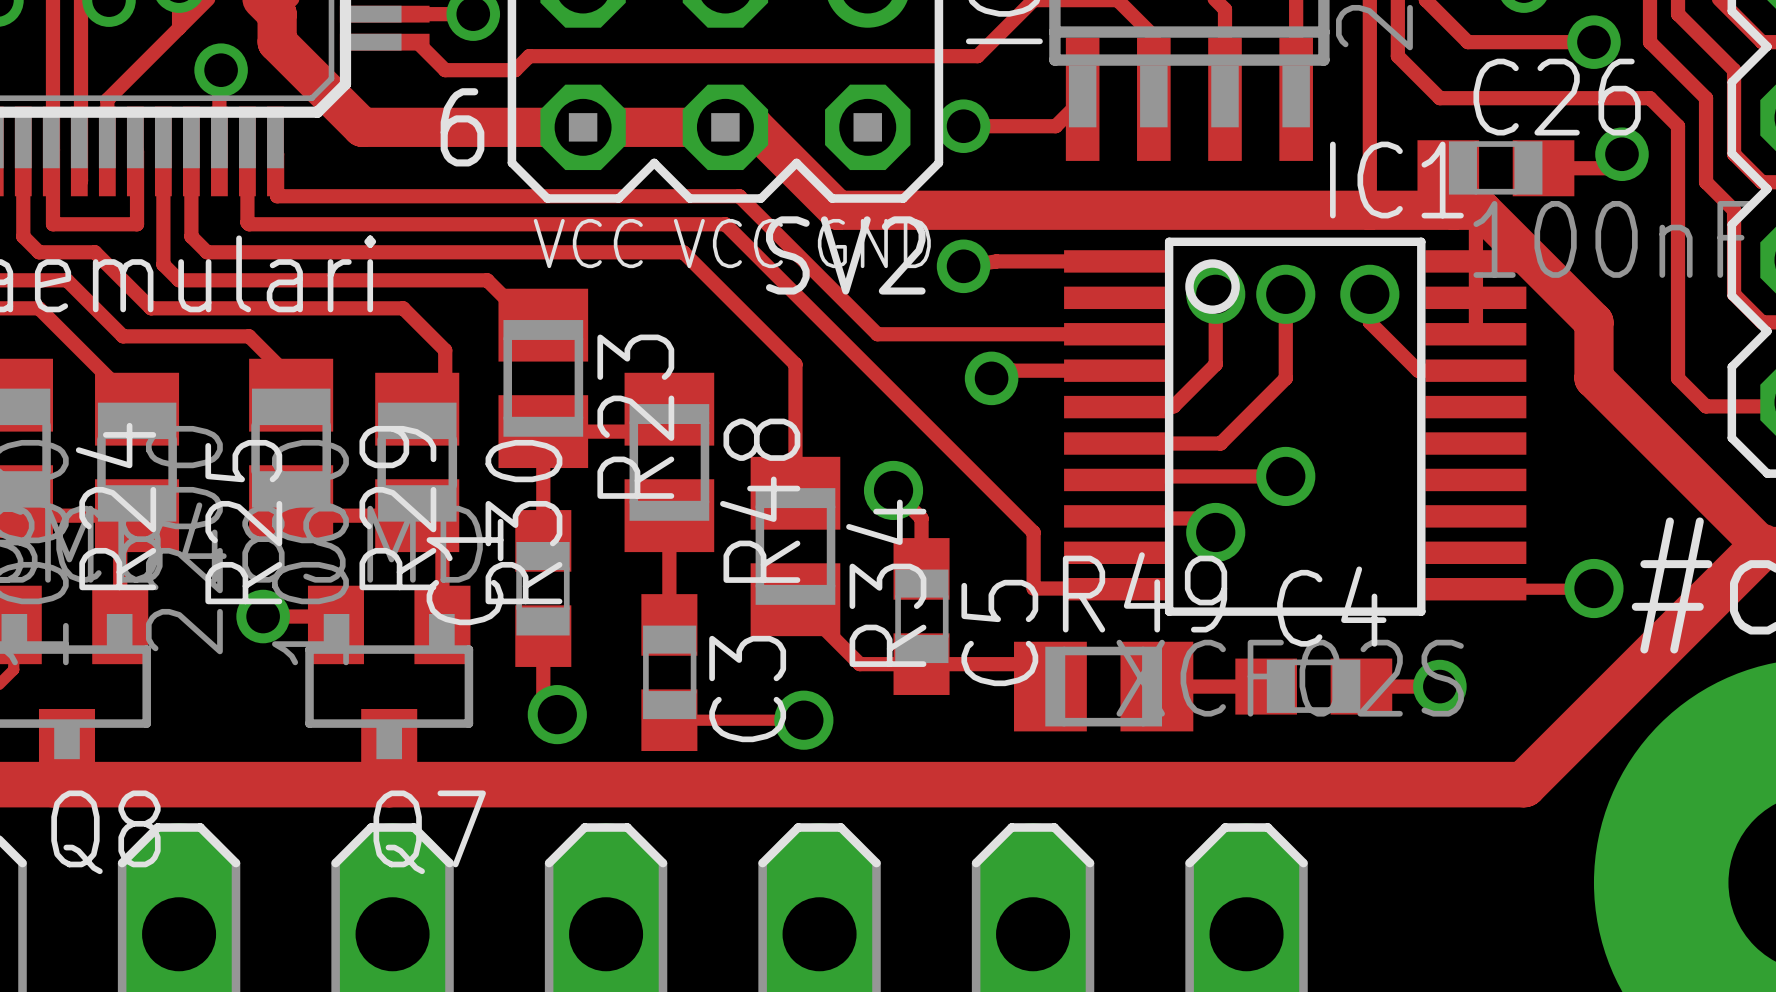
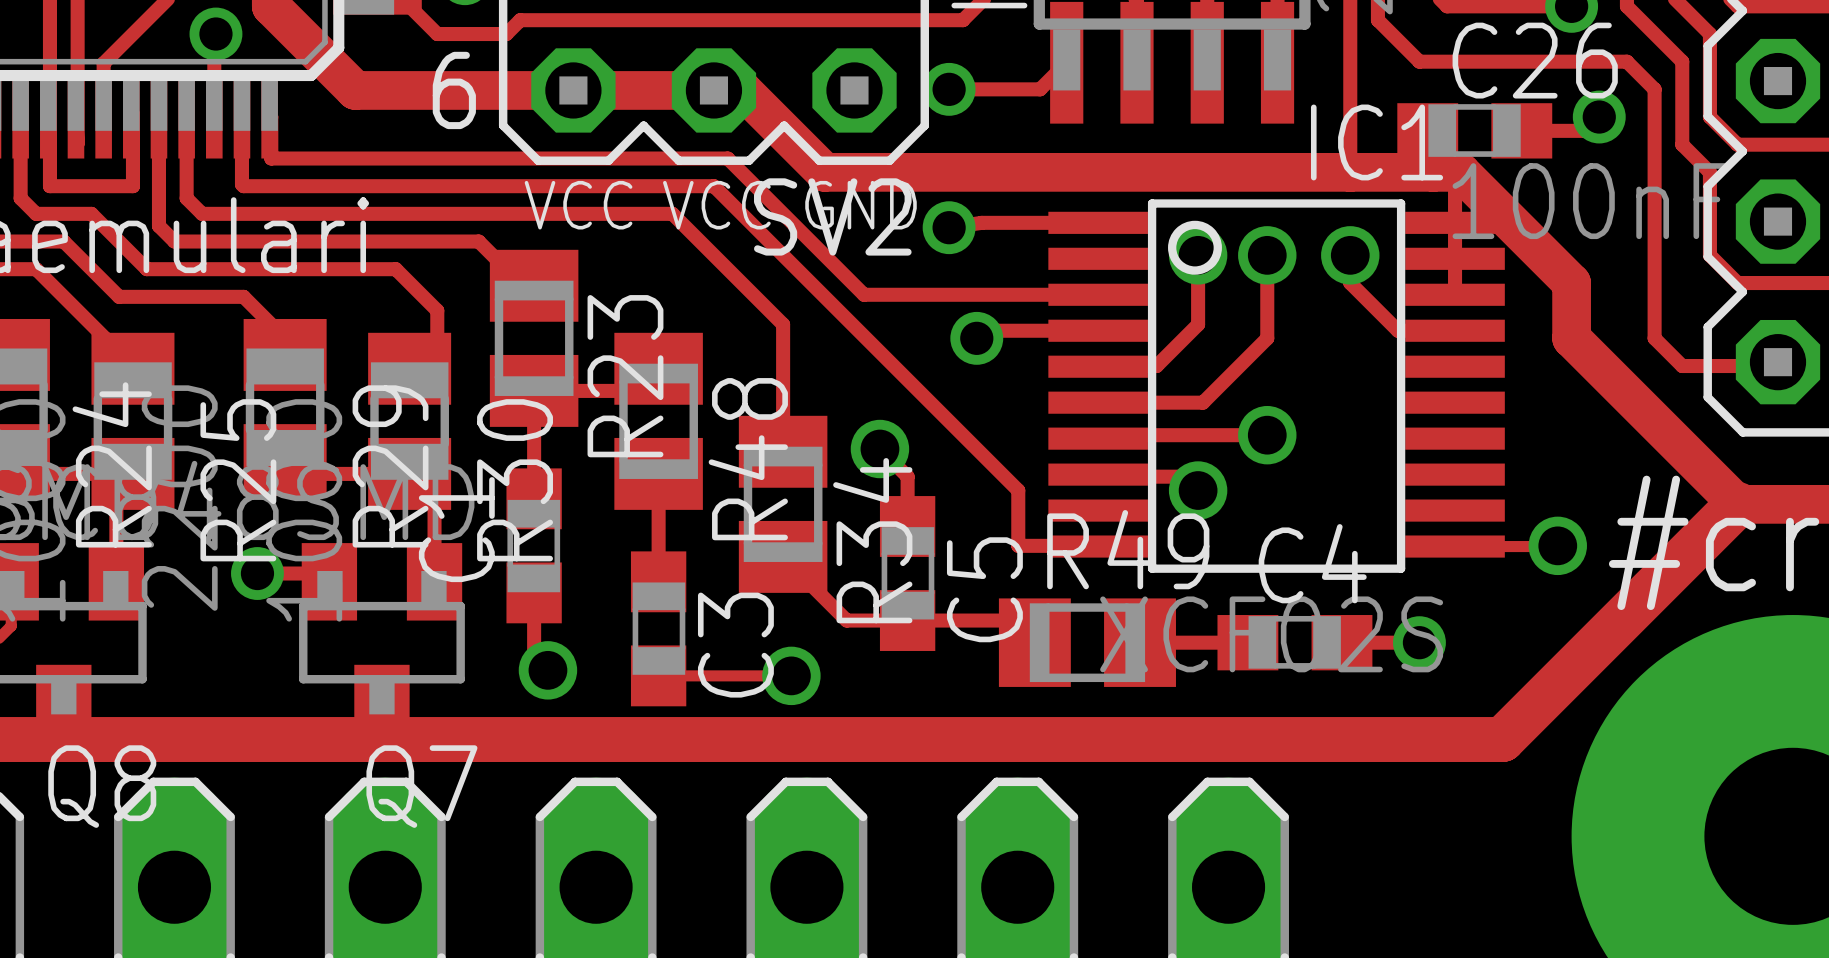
via position: (1593, 588) -> (1557, 545)

